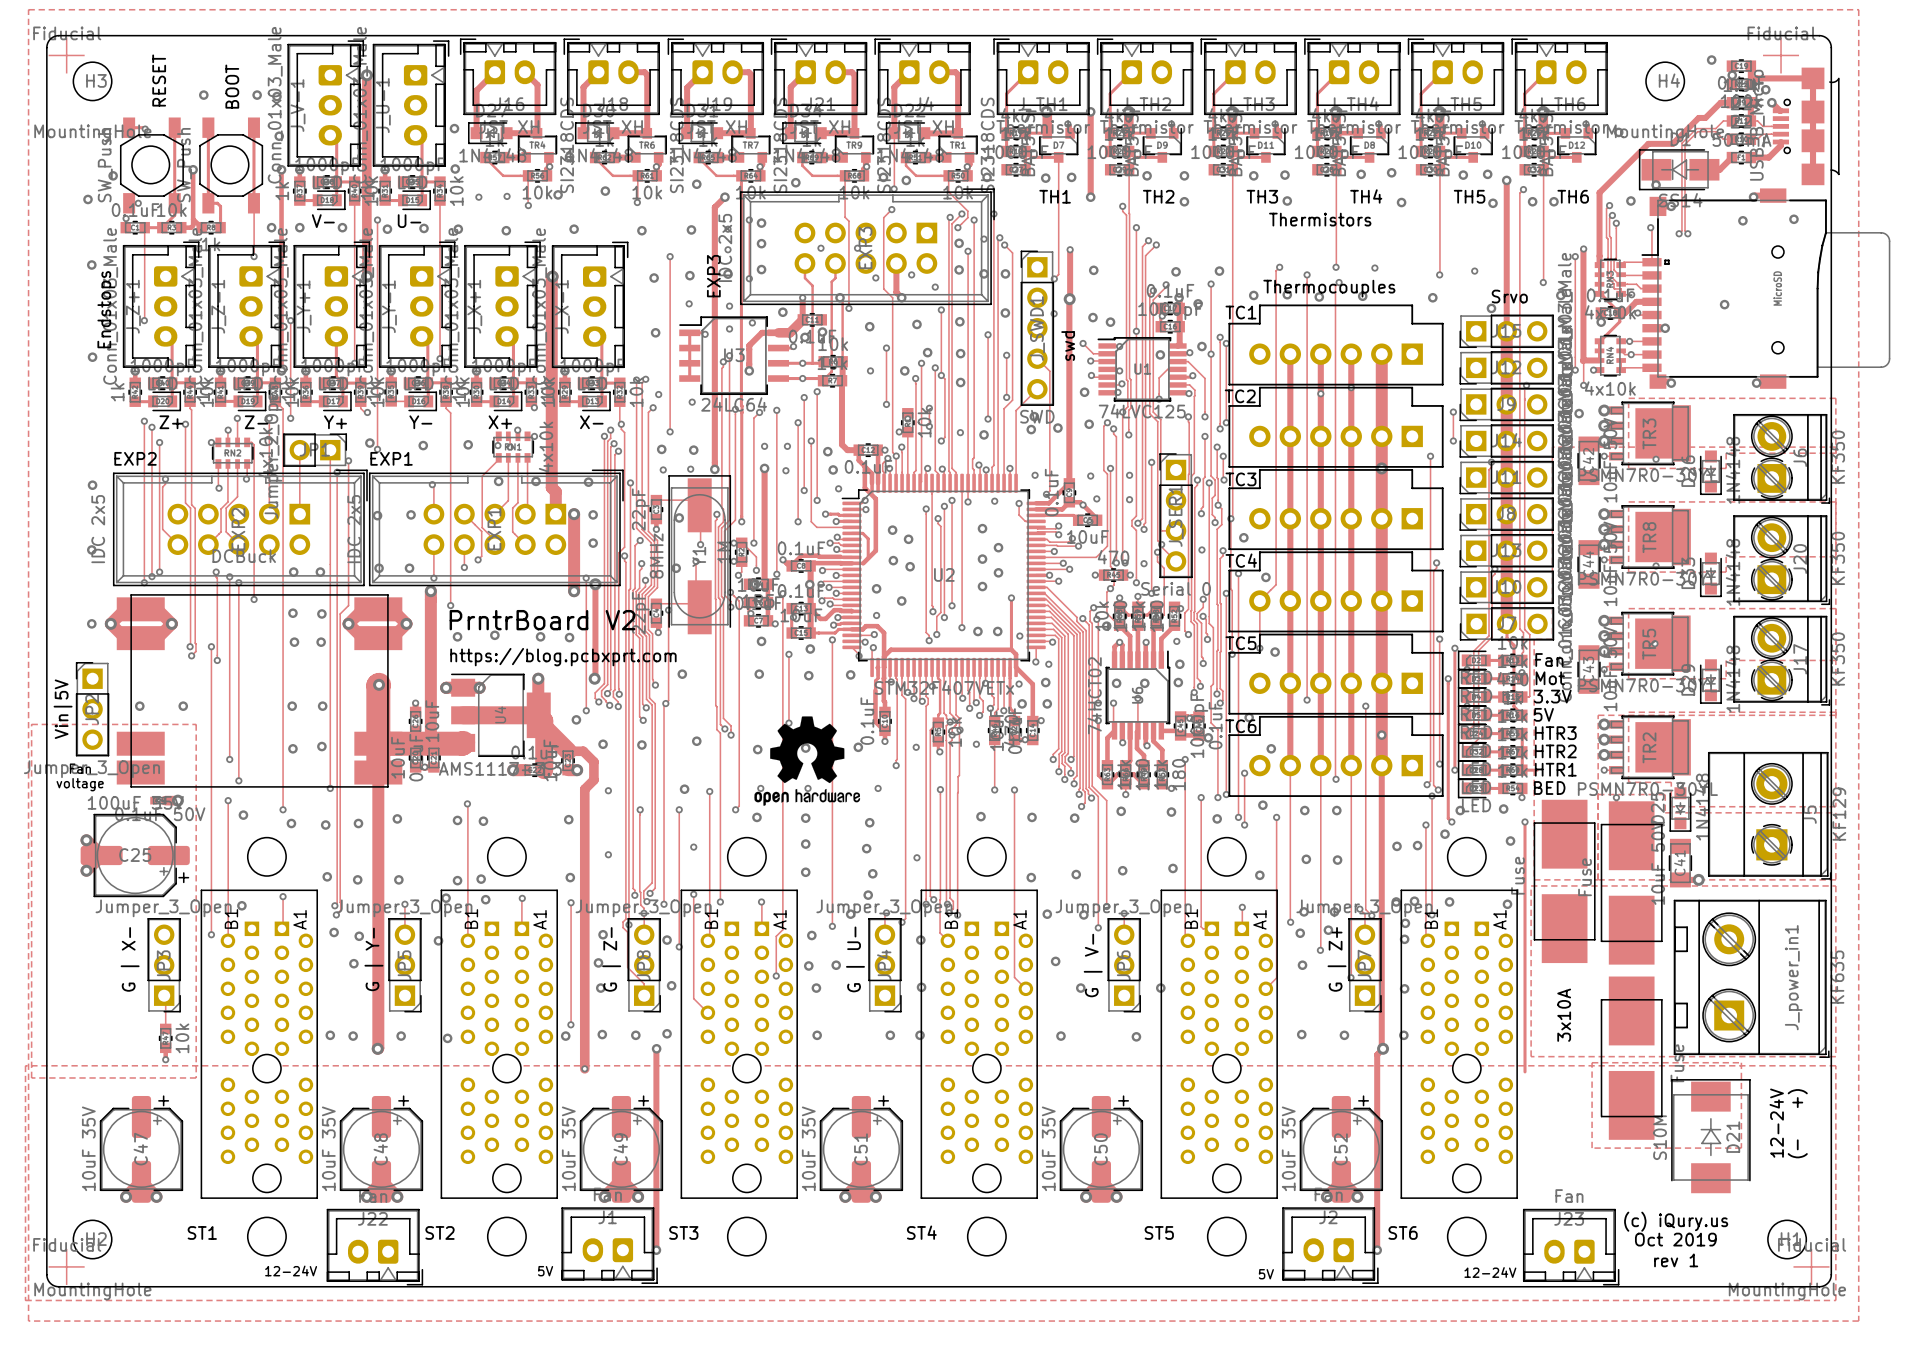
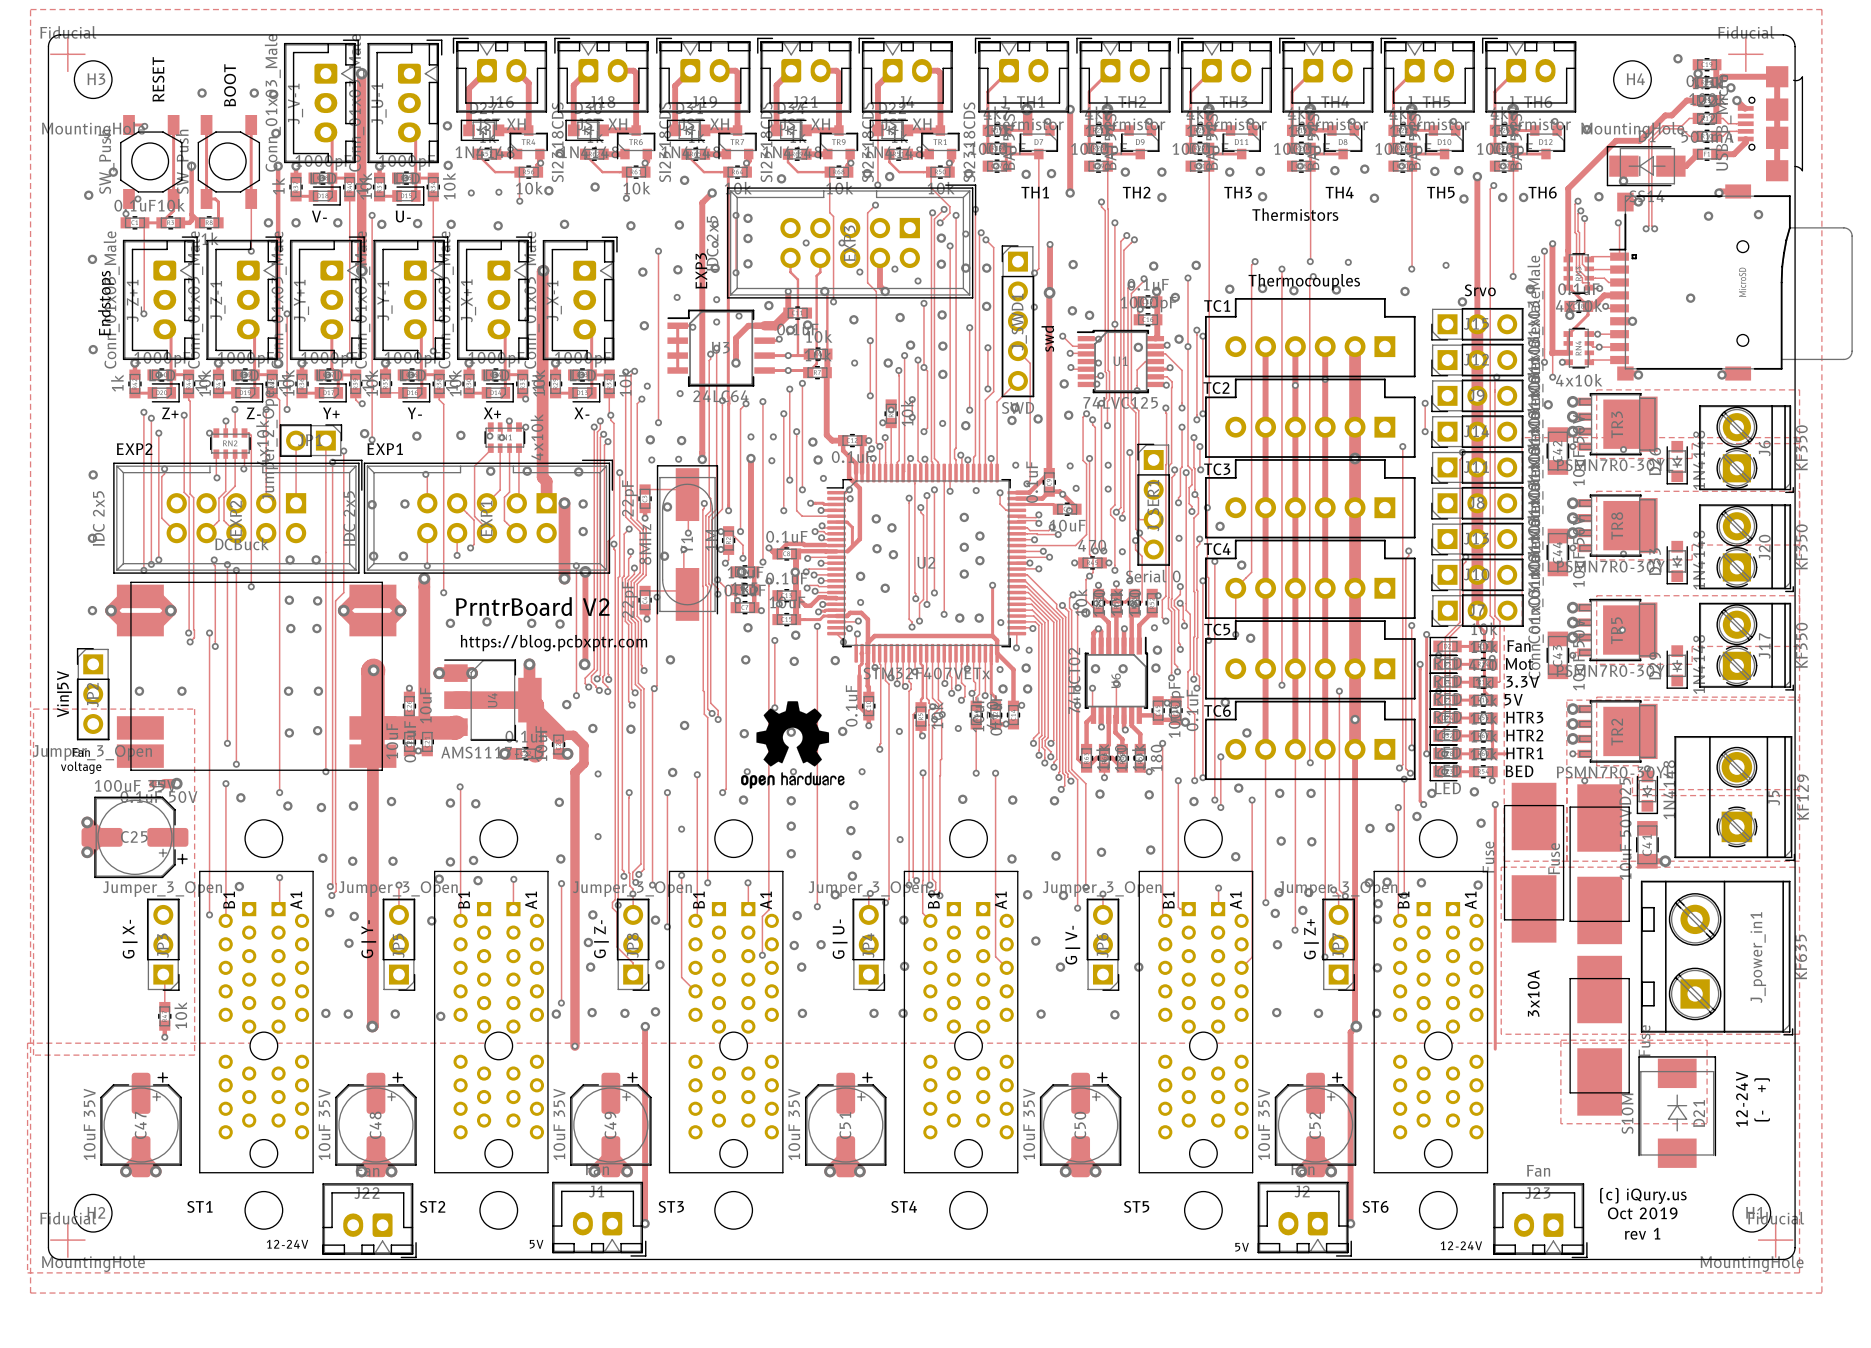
text: https://blog.pcbxprt.com (563, 657) -> https://blog.pcbxptr.com (553, 643)

